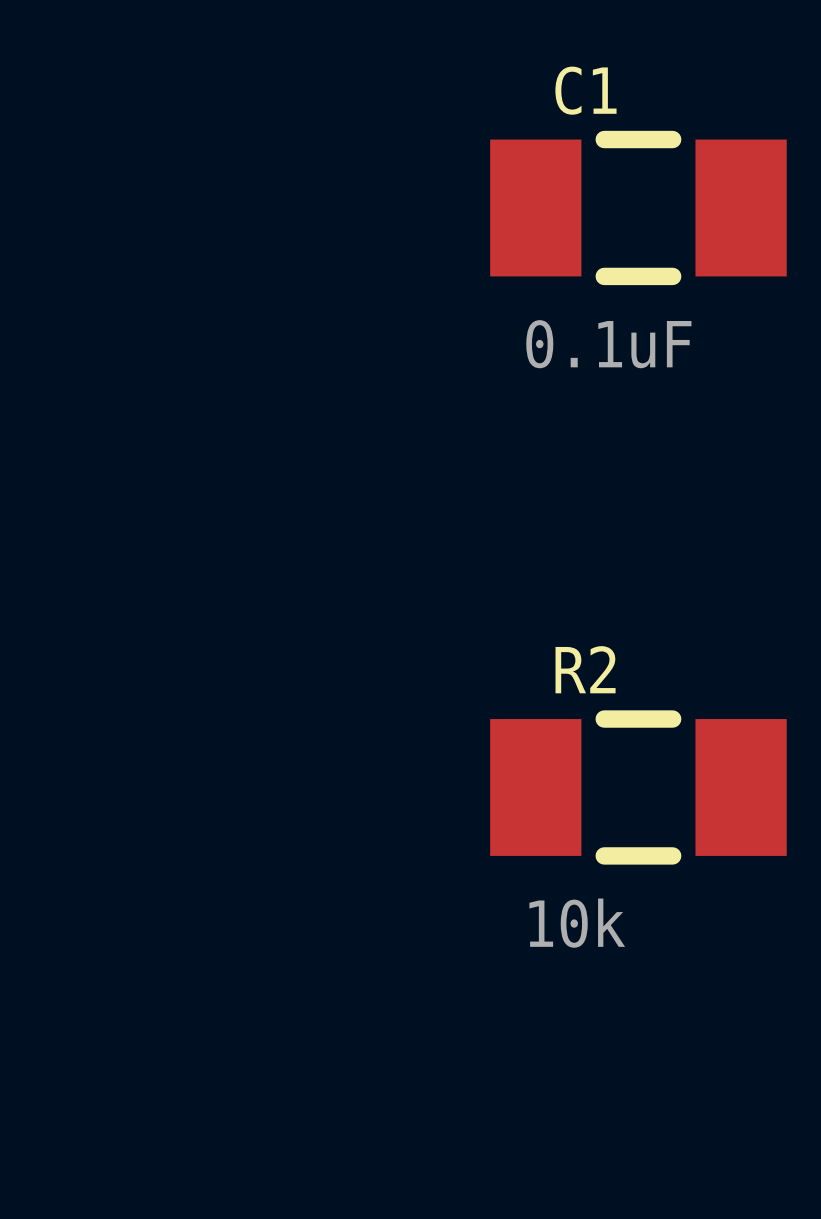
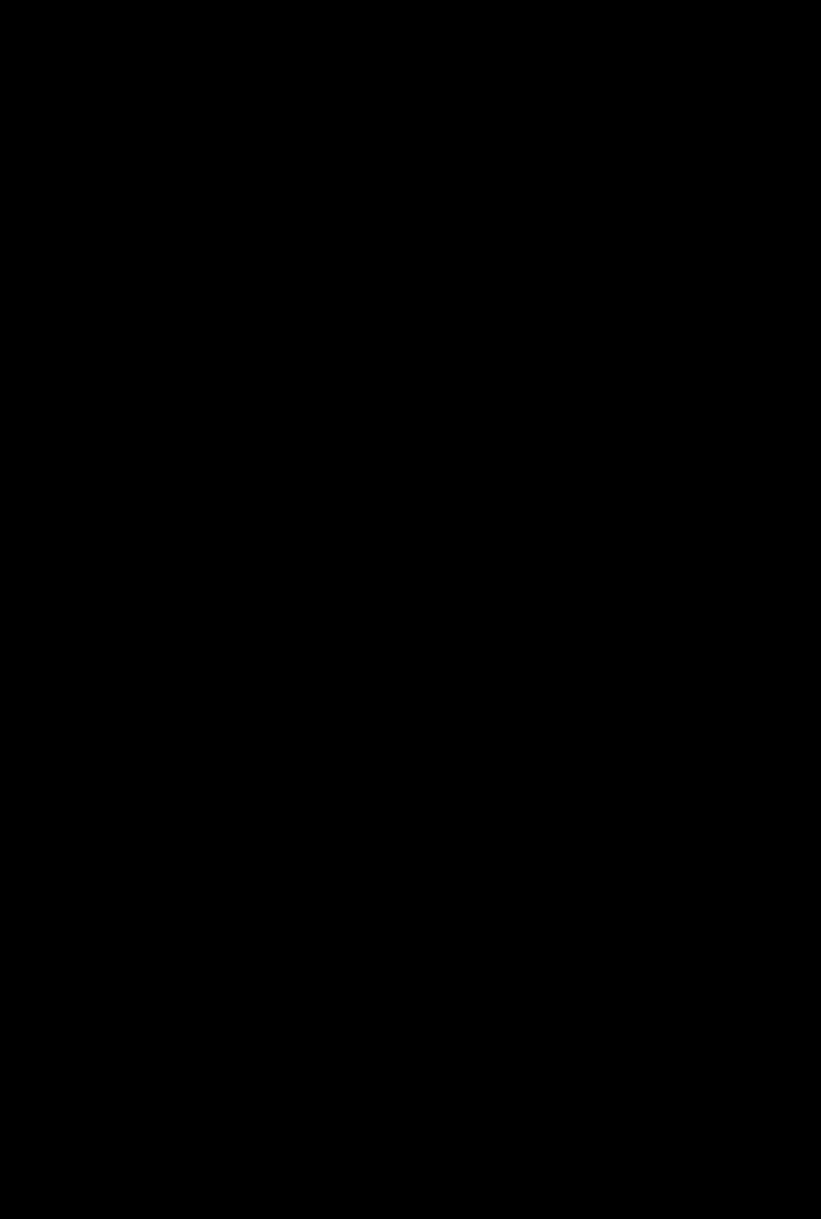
C1: 0.1uF (638, 207) -> none
R2: 10k (638, 787) -> none

